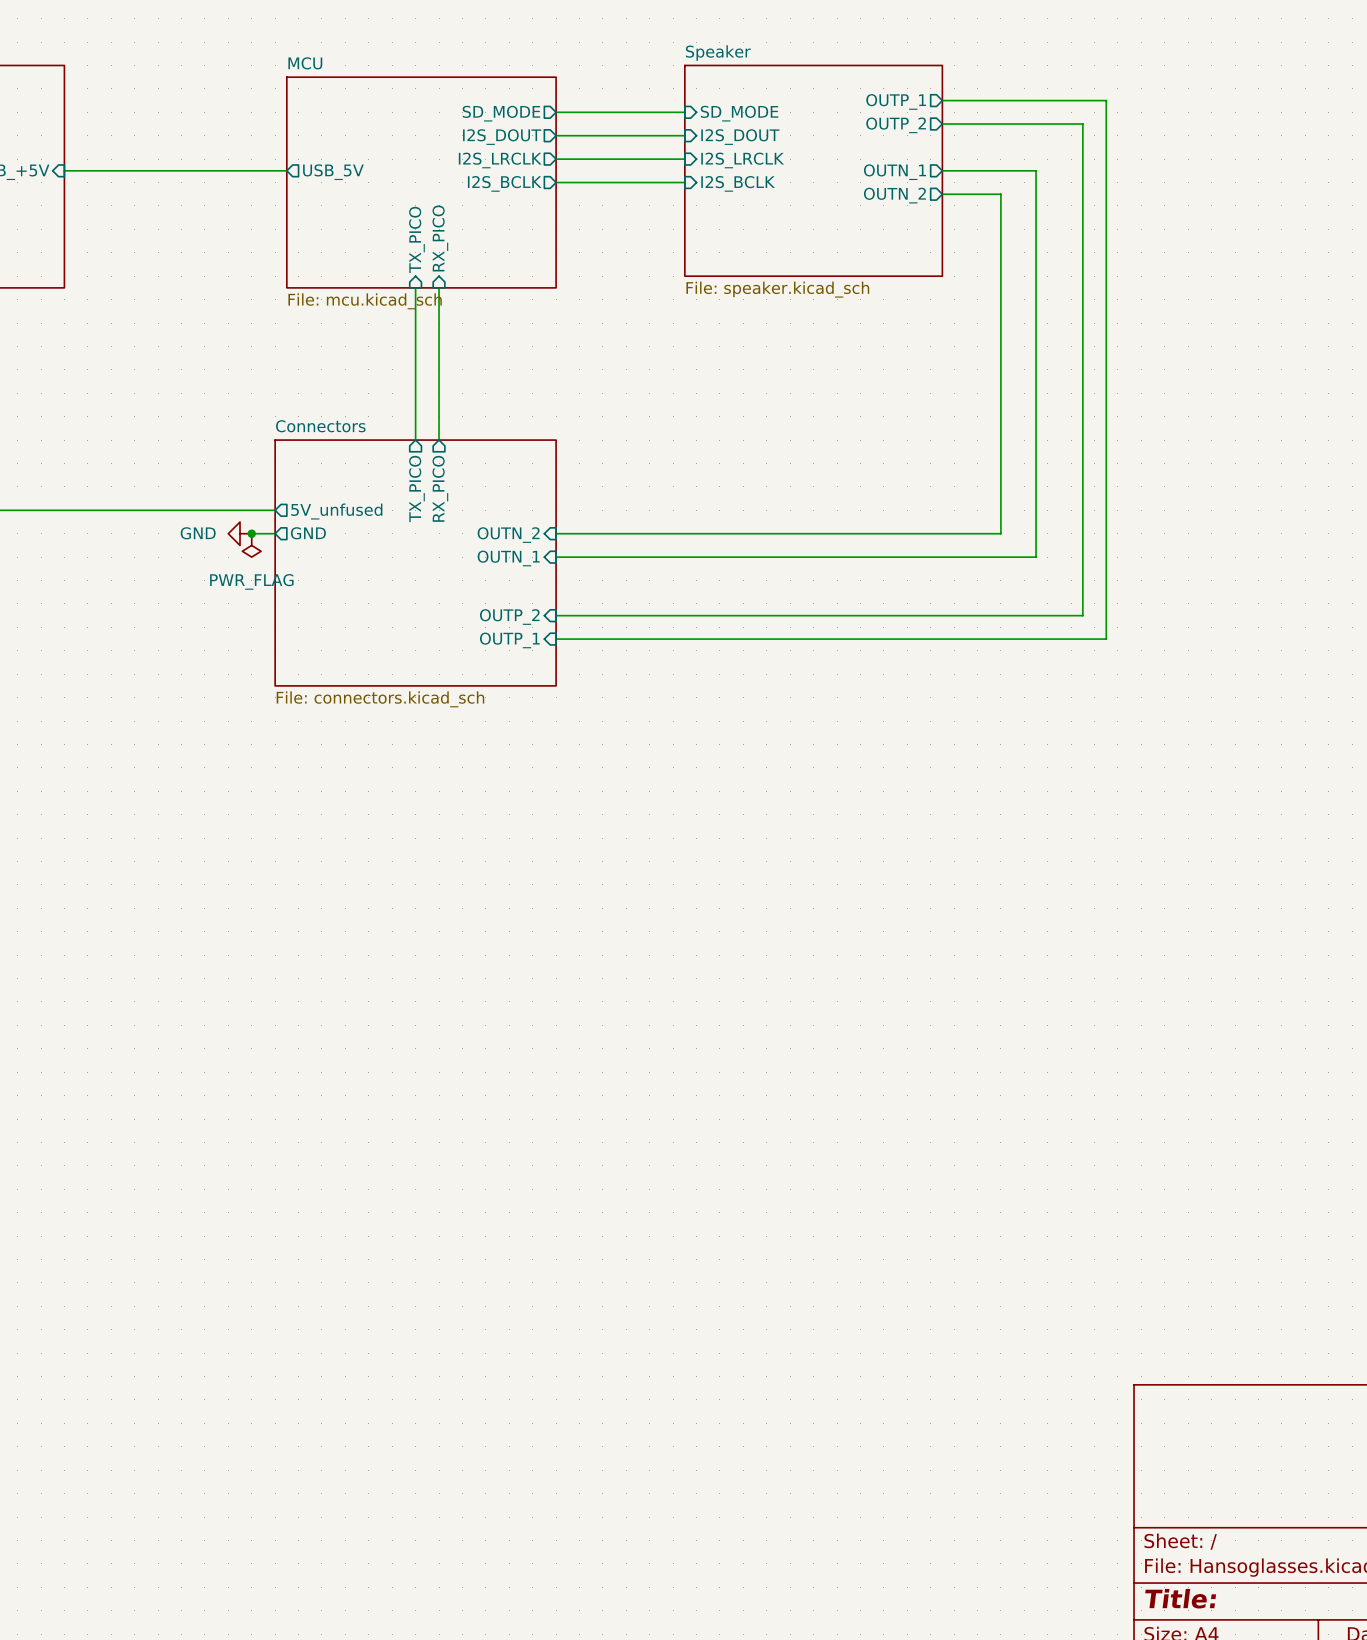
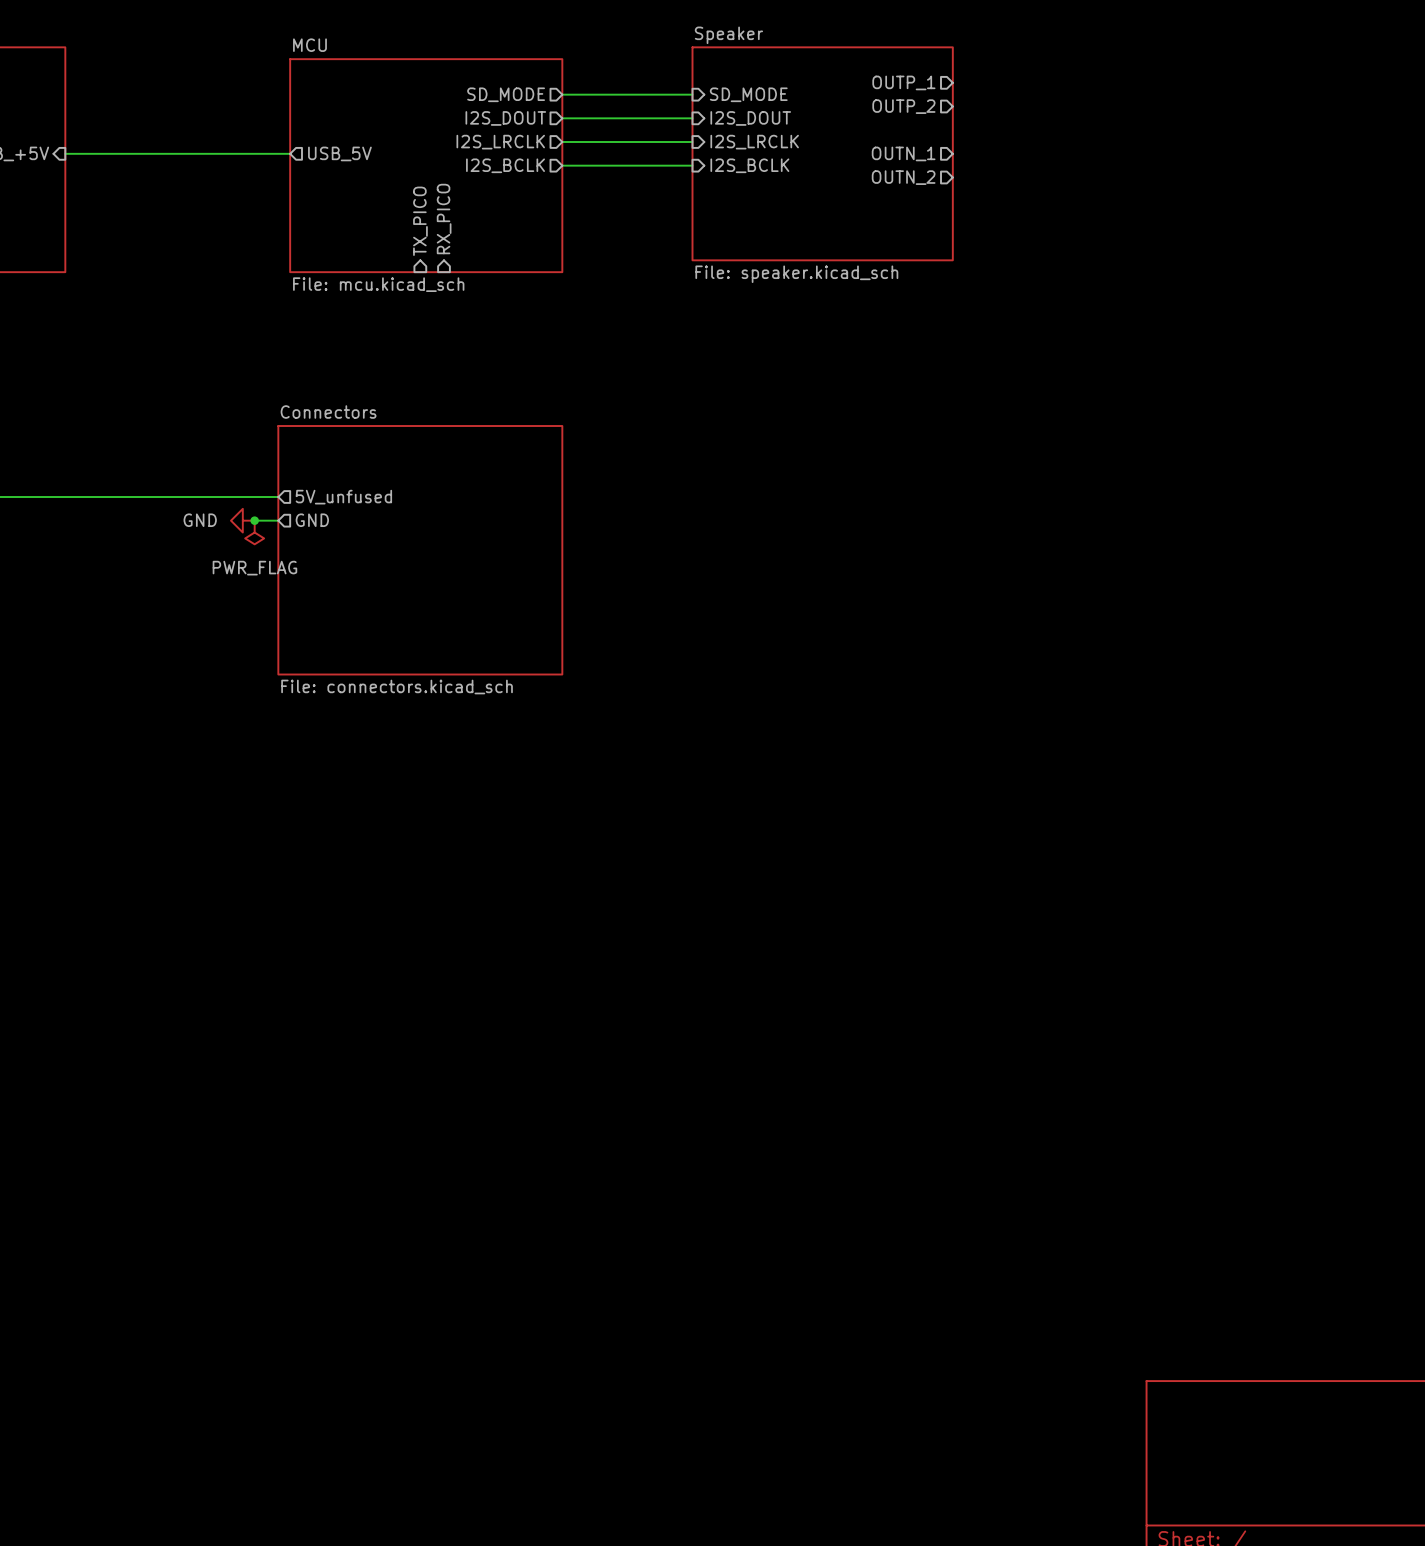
wire: (942, 100) (1106, 100) (1106, 639) (556, 639) -> none
wire: (942, 124) (1082, 124) (1082, 615) (556, 615) -> none
wire: (942, 170) (1036, 170) (1036, 557) (556, 557) -> none
wire: (942, 194) (1000, 194) (1000, 533) (556, 533) -> none
wire: (415, 287) (415, 440) -> none
wire: (439, 287) (439, 440) -> none
sheet pin: TX_PICO (416, 488) -> none
sheet pin: RX_PICO (440, 488) -> none
sheet pin: OUTN_2 (508, 535) -> none
sheet pin: OUTN_1 (508, 558) -> none
sheet pin: OUTP_2 (509, 617) -> none
sheet pin: OUTP_1 (509, 640) -> none

